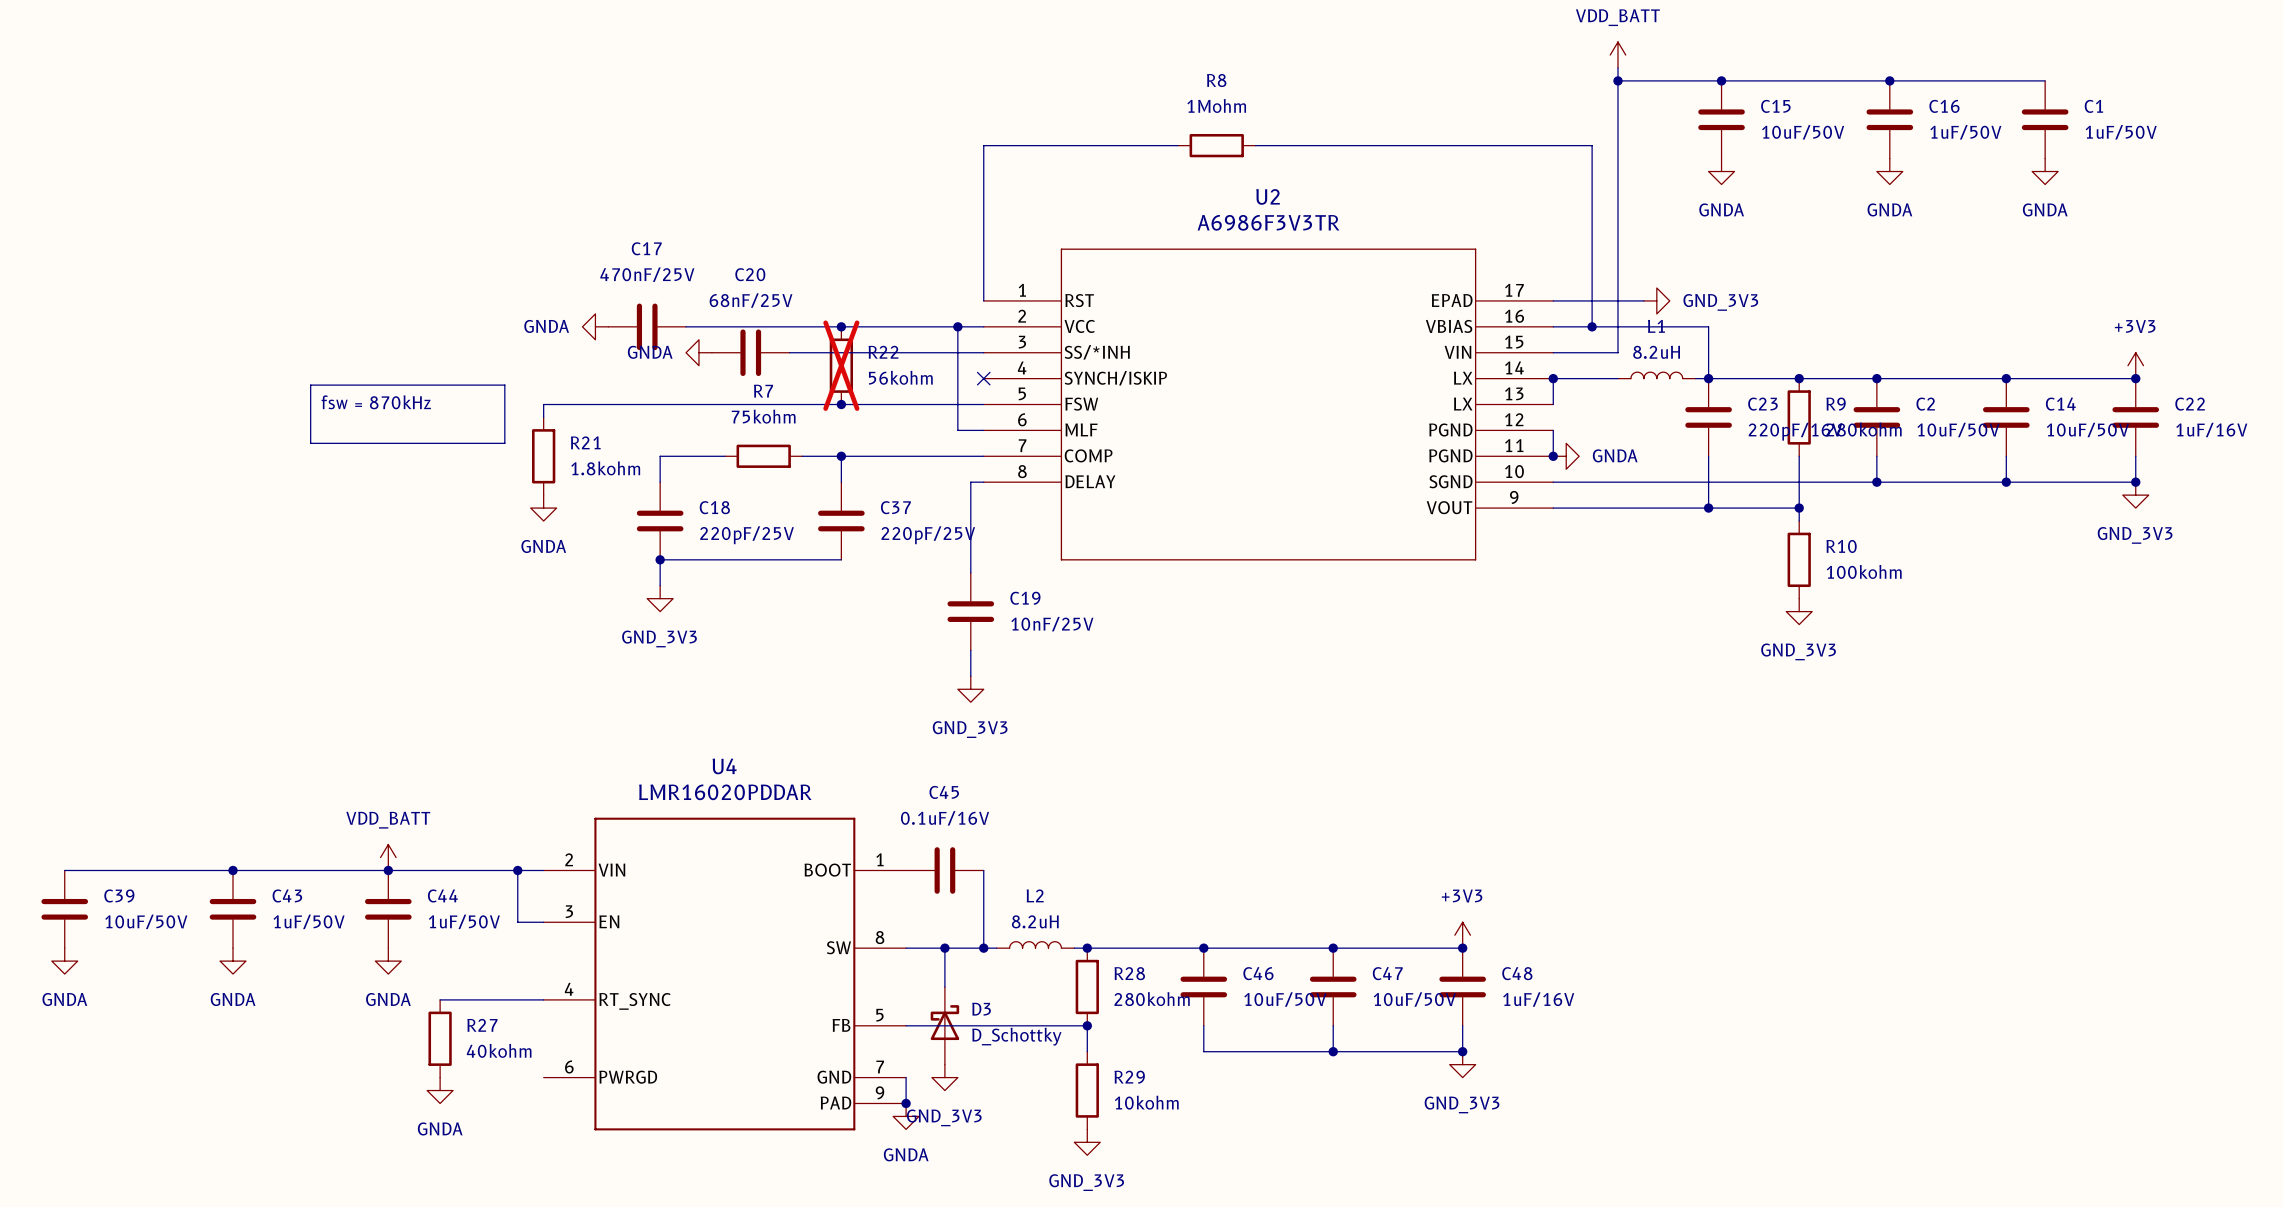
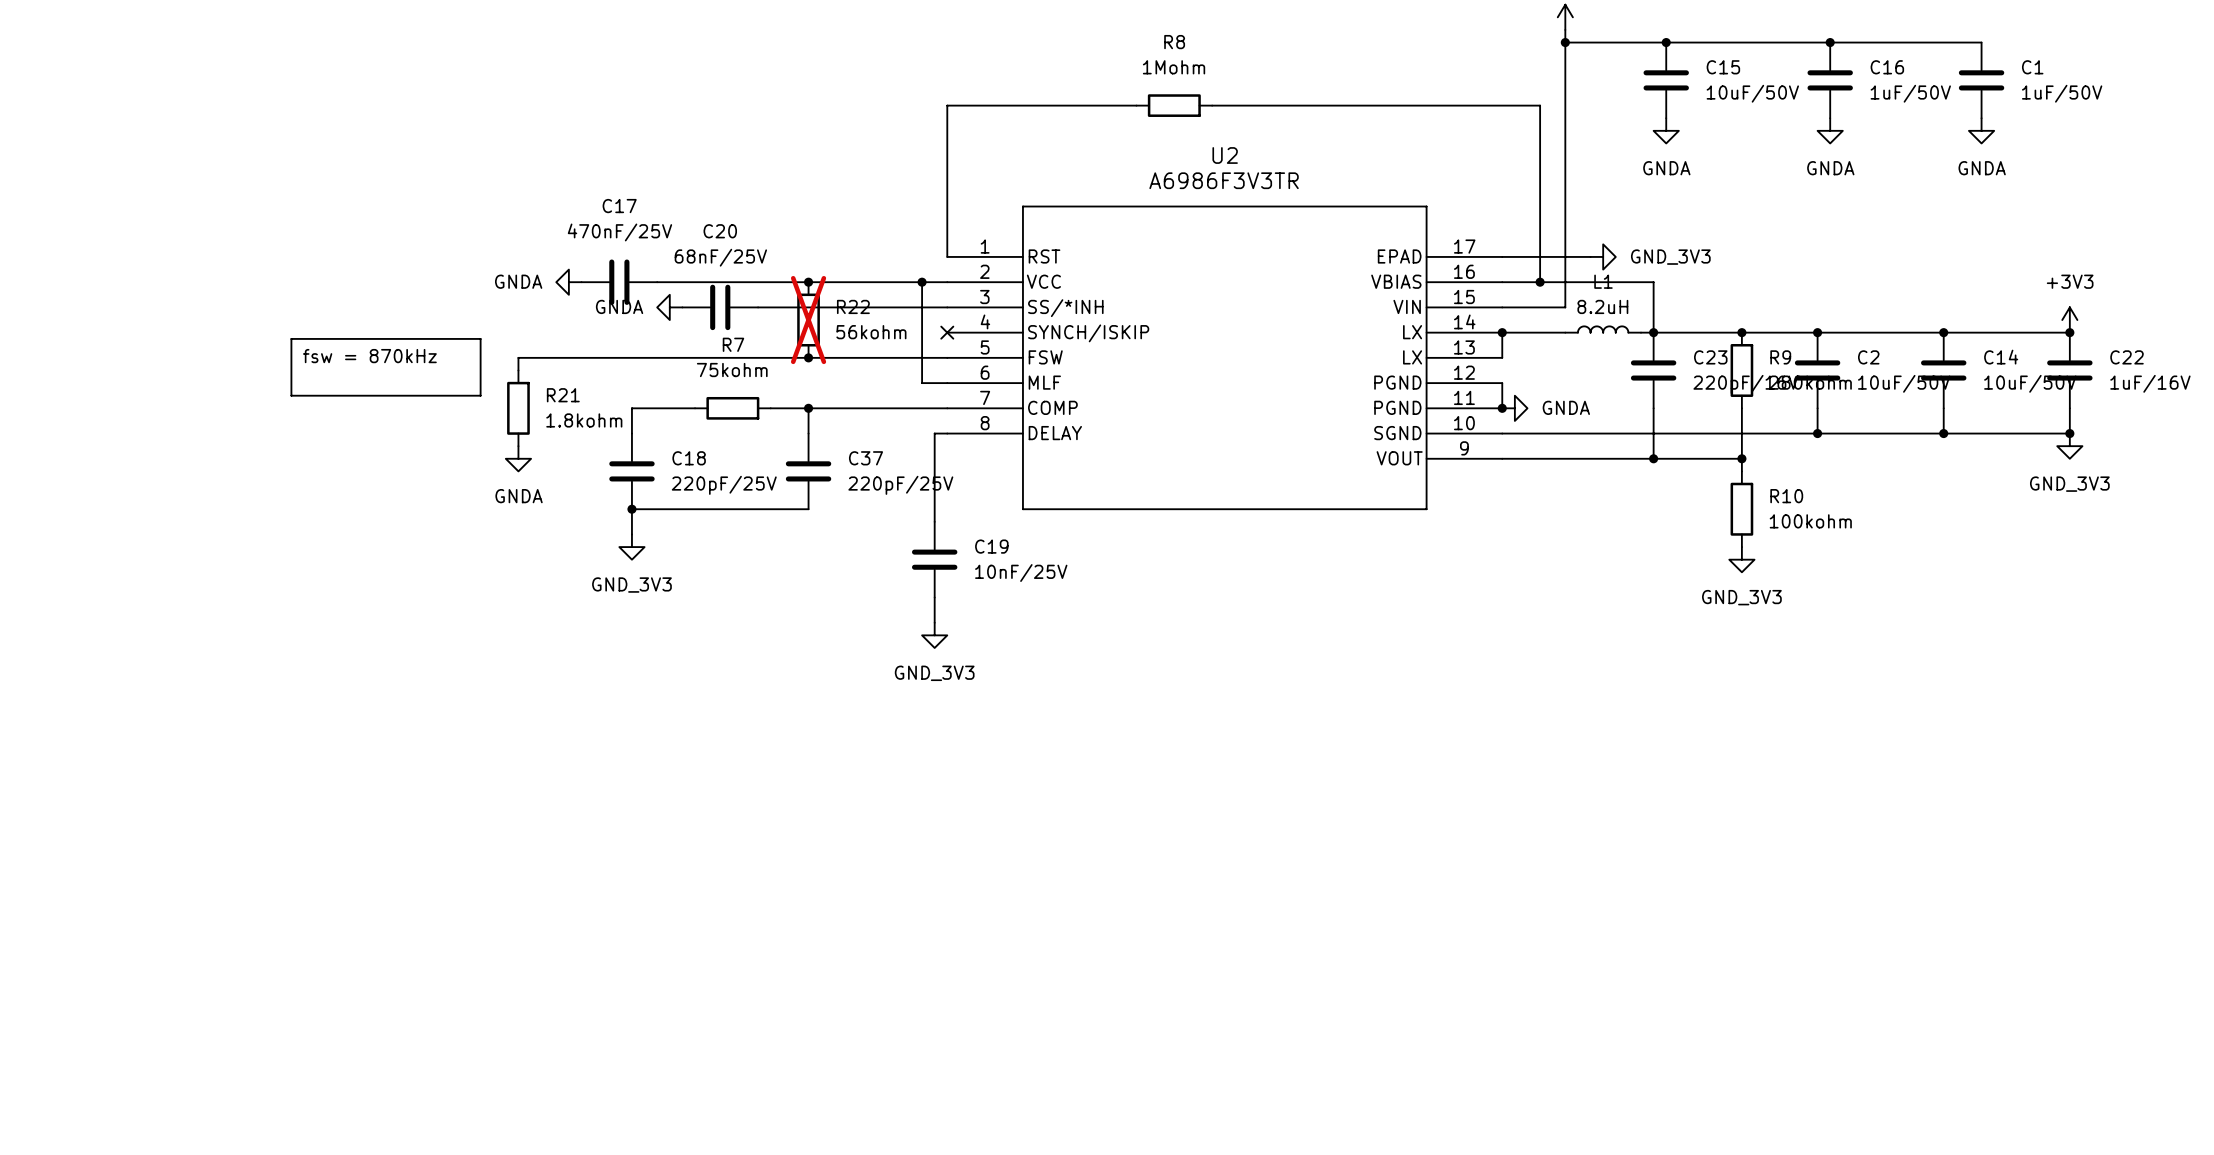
power symbol: VDD_BATT (388, 857) -> none
wire: (64, 870) (543, 870) -> none
junction: (233, 870) -> none
junction: (388, 870) -> none
wire: (517, 870) (517, 922) (543, 922) -> none
junction: (517, 870) -> none
C45: 0.1uF/16V (944, 870) -> none
wire: (983, 870) (983, 948) -> none
C39: 10uF/50V (64, 909) -> none
C43: 1uF/50V (233, 909) -> none
C44: 1uF/50V (388, 909) -> none
power symbol: +3V3 (1462, 935) -> none
L2: 8.2uH (1035, 944) -> none
wire: (906, 948) (996, 948) -> none
wire: (944, 948) (944, 986) -> none
junction: (944, 948) -> none
junction: (983, 948) -> none
wire: (1074, 948) (1462, 948) -> none
junction: (1087, 948) -> none
junction: (1203, 948) -> none
junction: (1333, 948) -> none
junction: (1462, 948) -> none
power symbol: GNDA (64, 961) -> none
power symbol: GNDA (233, 961) -> none
power symbol: GNDA (388, 961) -> none
U4: LMR16020PDDAR (724, 974) -> none
R28: 280kohm (1087, 986) -> none
C46: 10uF/50V (1203, 986) -> none
C47: 10uF/50V (1333, 986) -> none
C48: 1uF/16V (1462, 986) -> none
wire: (440, 999) (543, 999) -> none
wire: (906, 1025) (1087, 1025) (1087, 1051) -> none
D3: D_Schottky (944, 1025) -> none
junction: (1087, 1025) -> none
wire: (1203, 1025) (1203, 1051) (1462, 1051) (1462, 1025) -> none
wire: (1333, 1025) (1333, 1051) -> none
R27: 40kohm (440, 1038) -> none
junction: (1333, 1051) -> none
junction: (1462, 1051) -> none
power symbol: GND_3V3 (1462, 1064) -> none
wire: (906, 1077) (906, 1103) -> none
power symbol: GND_3V3 (944, 1077) -> none
power symbol: GNDA (440, 1090) -> none
R29: 10kohm (1087, 1090) -> none
junction: (906, 1103) -> none
power symbol: GNDA (906, 1116) -> none
power symbol: GND_3V3 (1087, 1142) -> none

